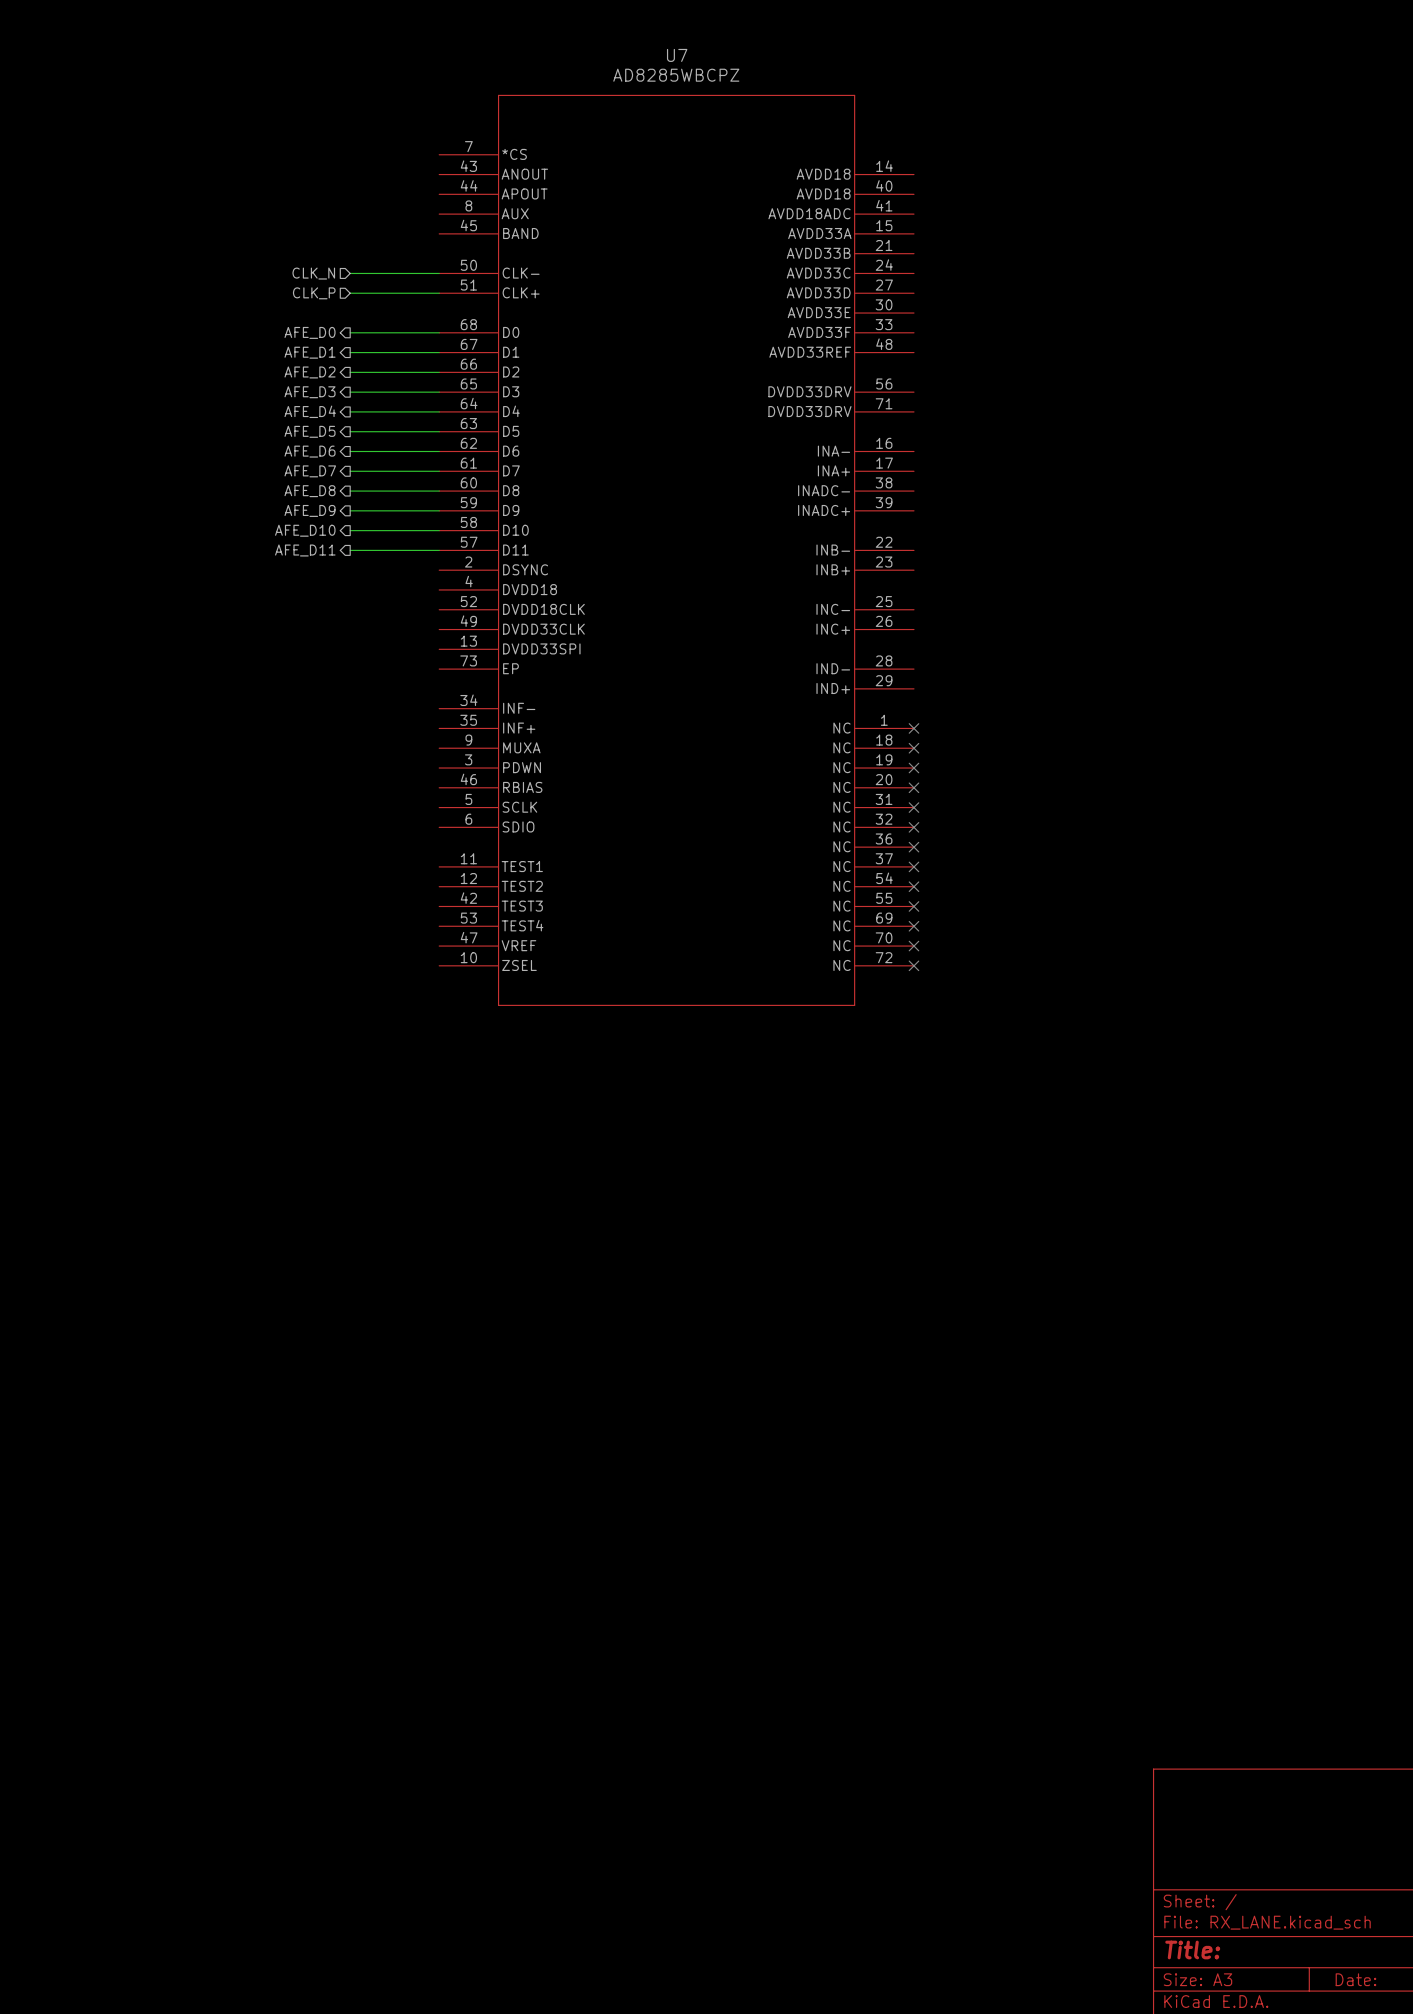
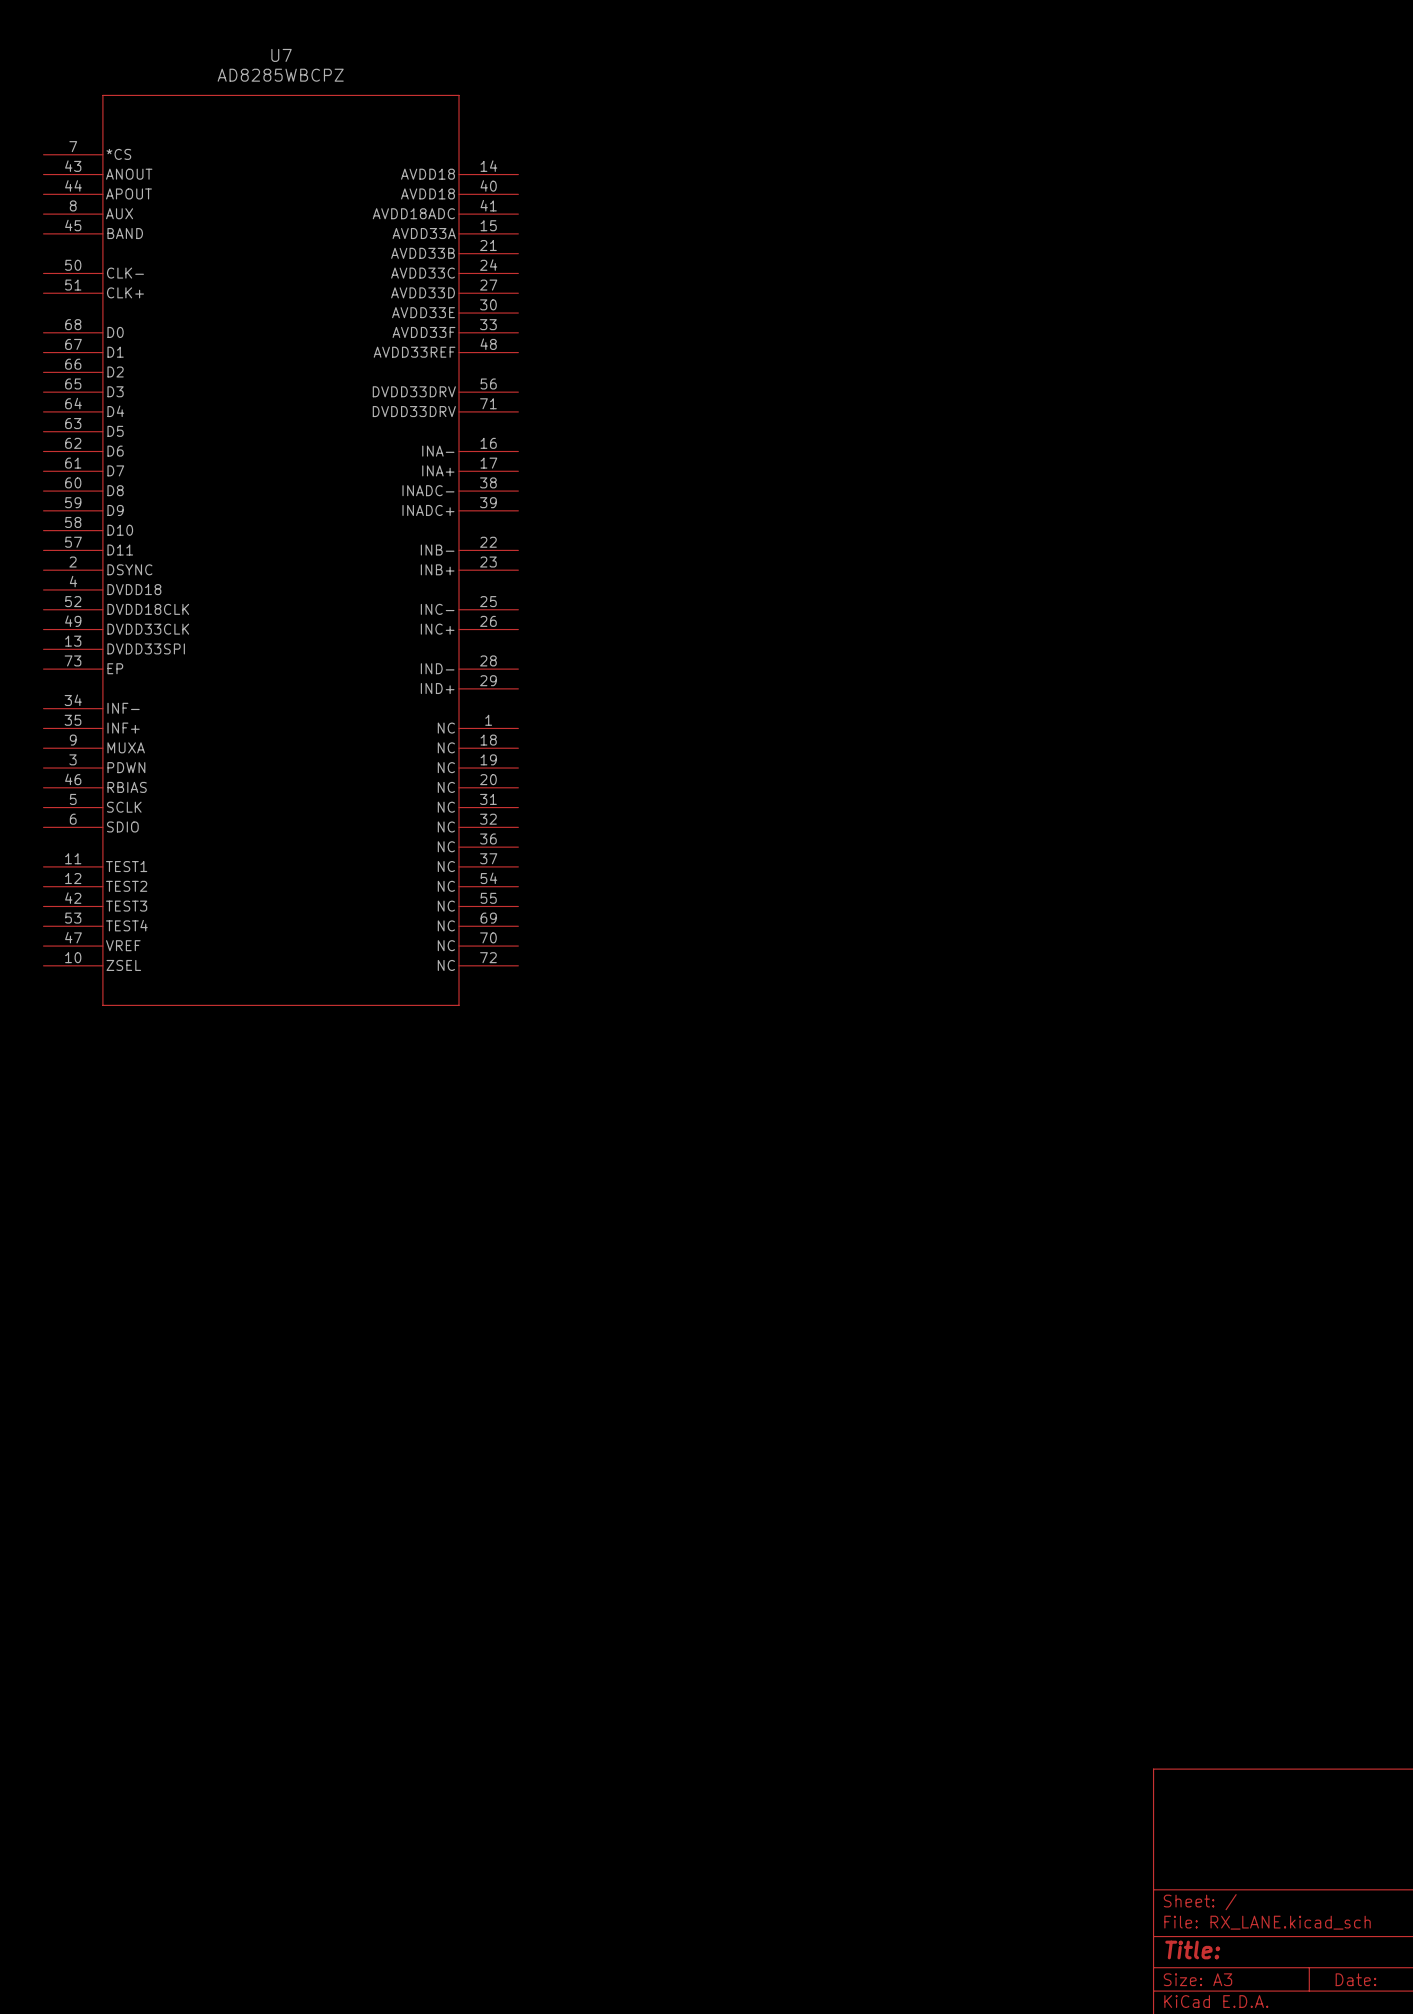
hierarchical label: CLK_N (313, 273) -> none
wire: (350, 273) (439, 273) -> none
hierarchical label: CLK_P (314, 293) -> none
wire: (350, 293) (439, 293) -> none
hierarchical label: AFE_D0 (310, 332) -> none
wire: (350, 332) (439, 332) -> none
hierarchical label: AFE_D1 (310, 352) -> none
wire: (350, 352) (439, 352) -> none
hierarchical label: AFE_D2 (310, 372) -> none
wire: (350, 372) (439, 372) -> none
hierarchical label: AFE_D3 (310, 392) -> none
wire: (350, 392) (439, 392) -> none
hierarchical label: AFE_D4 (310, 411) -> none
wire: (350, 411) (439, 411) -> none
hierarchical label: AFE_D5 (310, 431) -> none
wire: (350, 431) (439, 431) -> none
hierarchical label: AFE_D6 (310, 451) -> none
wire: (350, 451) (439, 451) -> none
hierarchical label: AFE_D7 (310, 471) -> none
wire: (350, 471) (439, 471) -> none
hierarchical label: AFE_D8 (310, 491) -> none
wire: (350, 491) (439, 491) -> none
hierarchical label: AFE_D9 (310, 510) -> none
wire: (350, 510) (439, 510) -> none
hierarchical label: AFE_D10 (305, 530) -> none
wire: (350, 530) (439, 530) -> none
hierarchical label: AFE_D11 (305, 550) -> none
wire: (350, 550) (439, 550) -> none
U7 position: (676, 550) -> (280, 550)
no-connect mark: (913, 728) -> none
no-connect mark: (913, 748) -> none
no-connect mark: (913, 768) -> none
no-connect mark: (913, 787) -> none
no-connect mark: (913, 807) -> none
no-connect mark: (913, 827) -> none
no-connect mark: (913, 847) -> none
no-connect mark: (913, 866) -> none
no-connect mark: (913, 886) -> none
no-connect mark: (913, 906) -> none
no-connect mark: (913, 926) -> none
no-connect mark: (913, 946) -> none
no-connect mark: (913, 965) -> none

